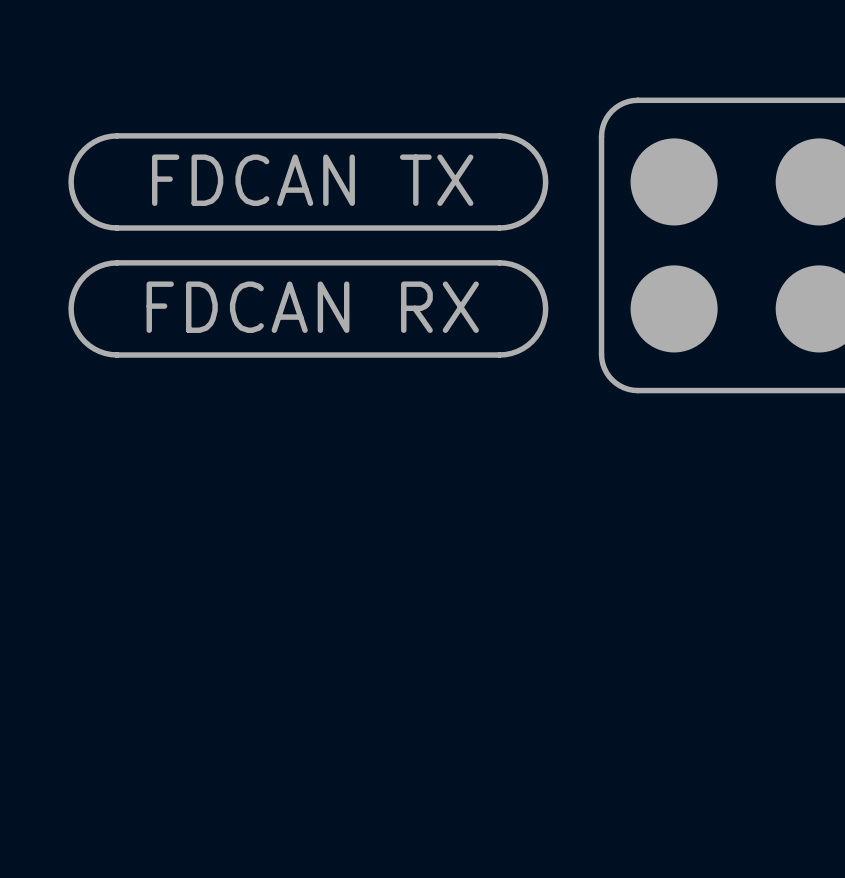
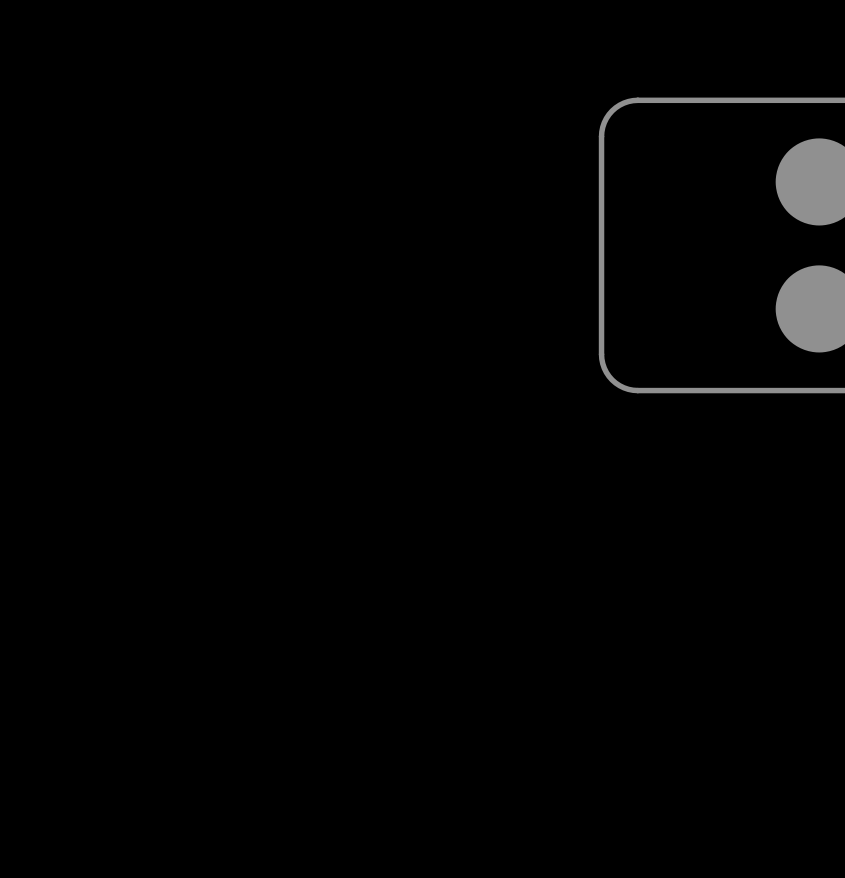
drawing: [630, 138, 718, 353] -> none
text: FDCAN TX (312, 180) -> none
line: (116, 228) (499, 228) -> none
line: (117, 228) (99, 224) (84, 214) (74, 199) (71, 181) (74, 164) (84, 149) (99, 139) (117, 135) (499, 135) (511, 137) (527, 145) (539, 158) (544, 170) (545, 187) (539, 204) (527, 218) (511, 226) (499, 228) -> none
text: FDCAN RX (312, 307) -> none
line: (116, 355) (499, 355) -> none
line: (117, 355) (99, 351) (84, 341) (74, 326) (71, 308) (74, 291) (84, 276) (99, 266) (117, 262) (499, 262) (511, 264) (527, 272) (539, 285) (544, 297) (545, 314) (539, 331) (527, 345) (511, 353) (499, 355) -> none

